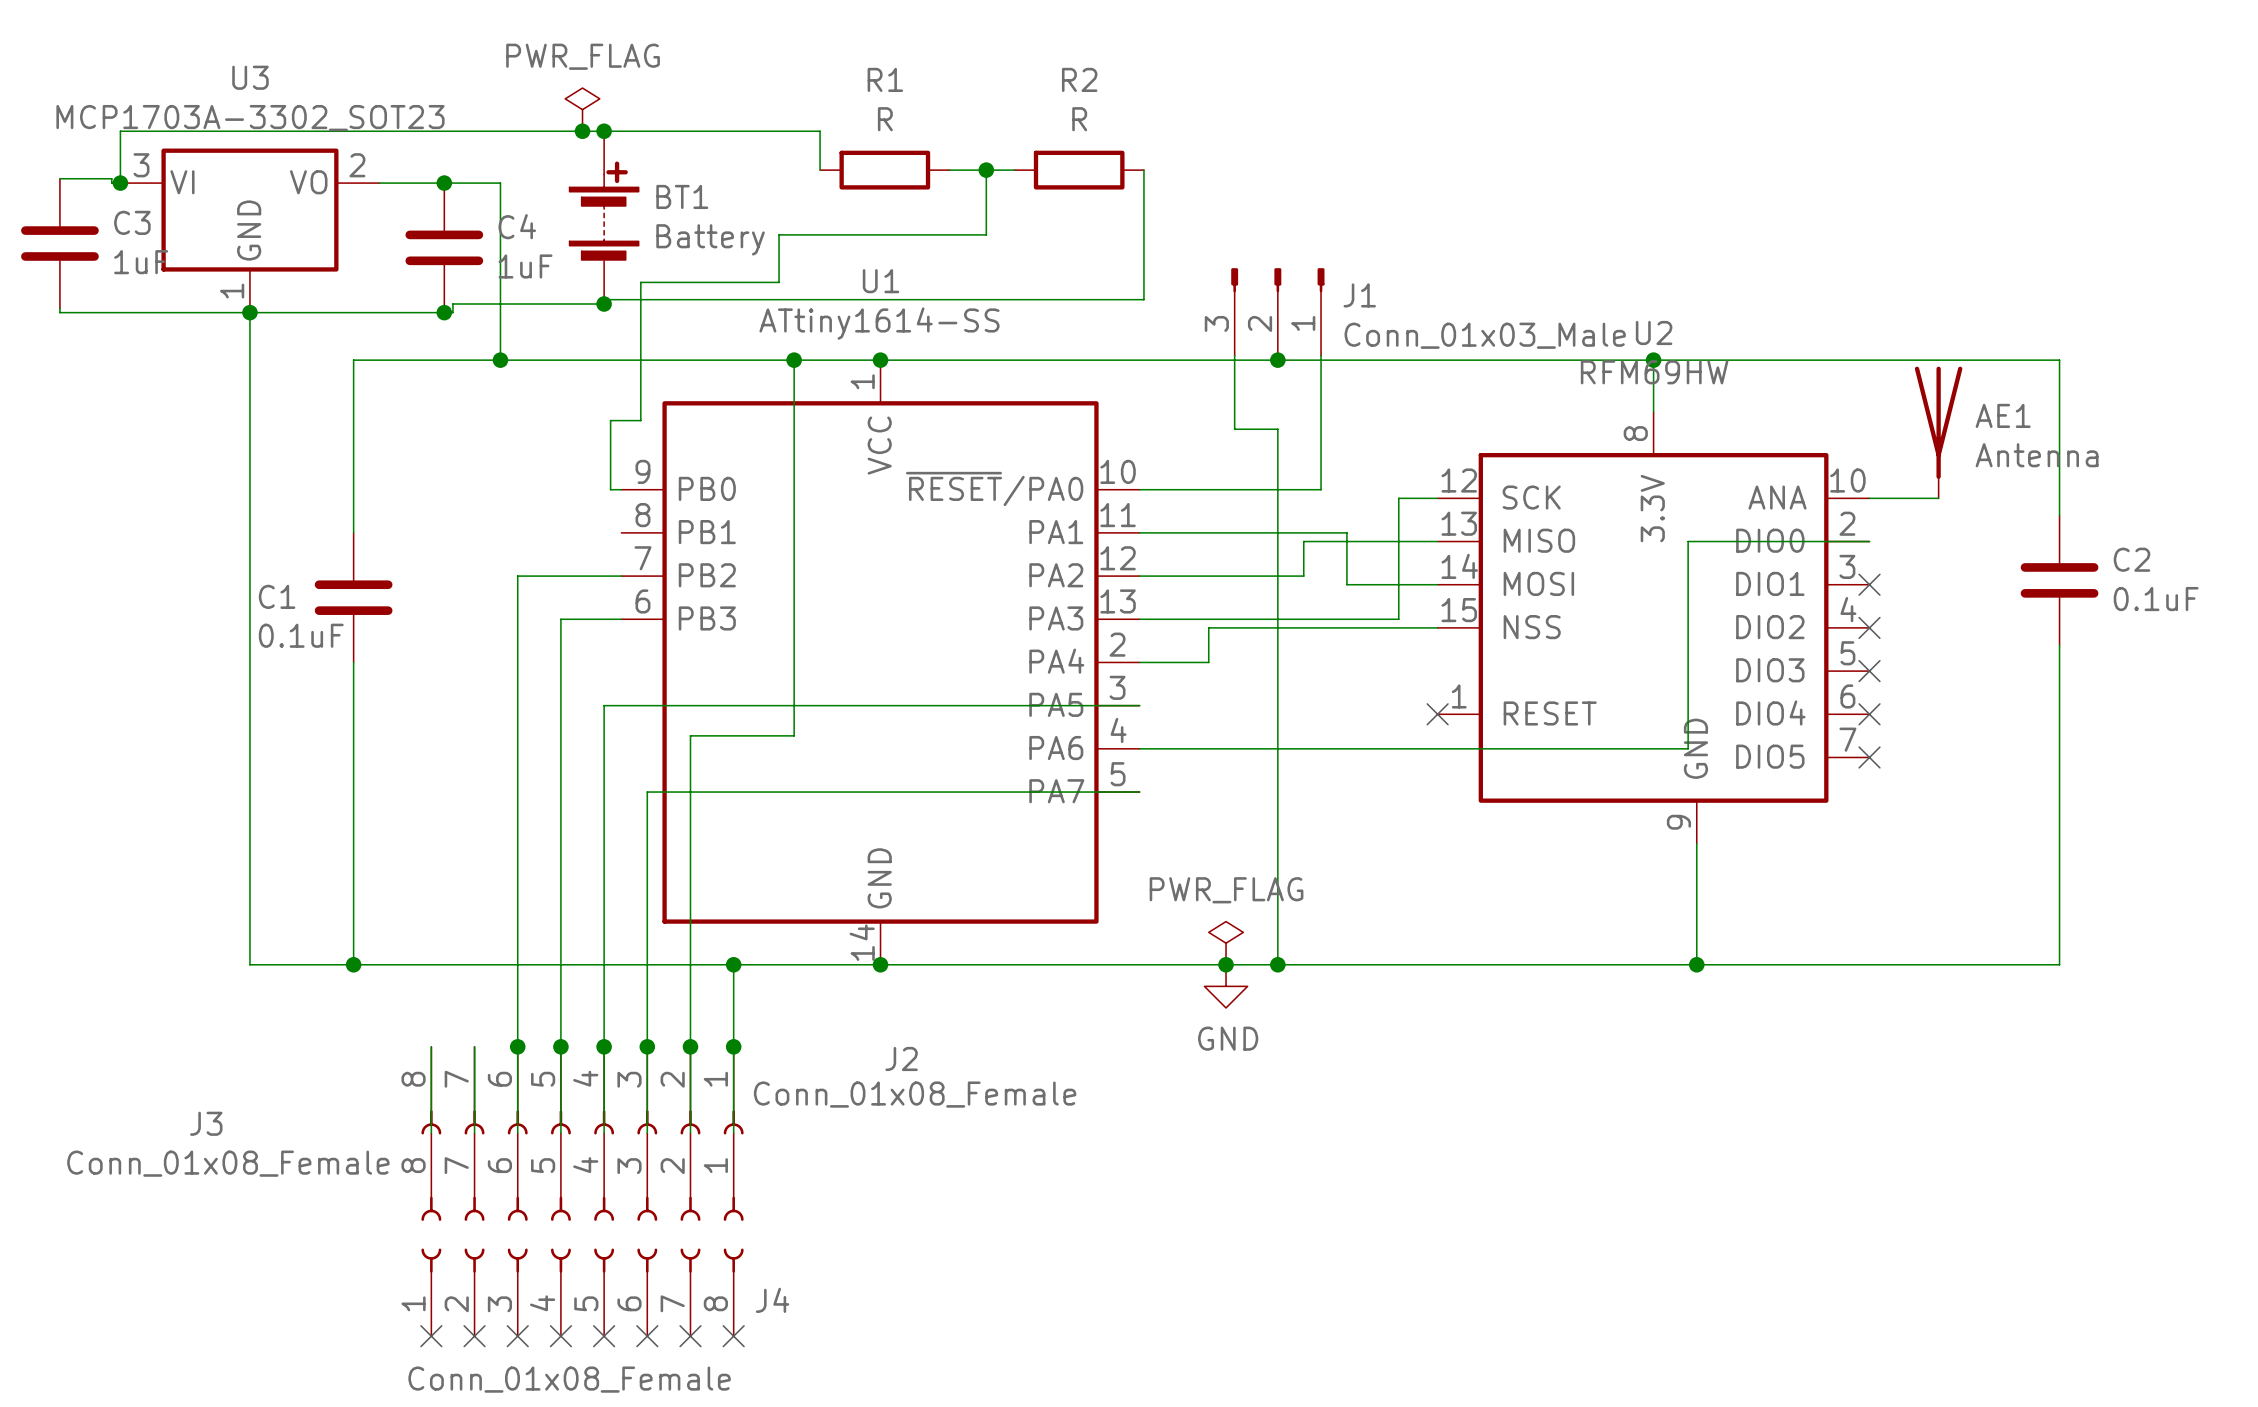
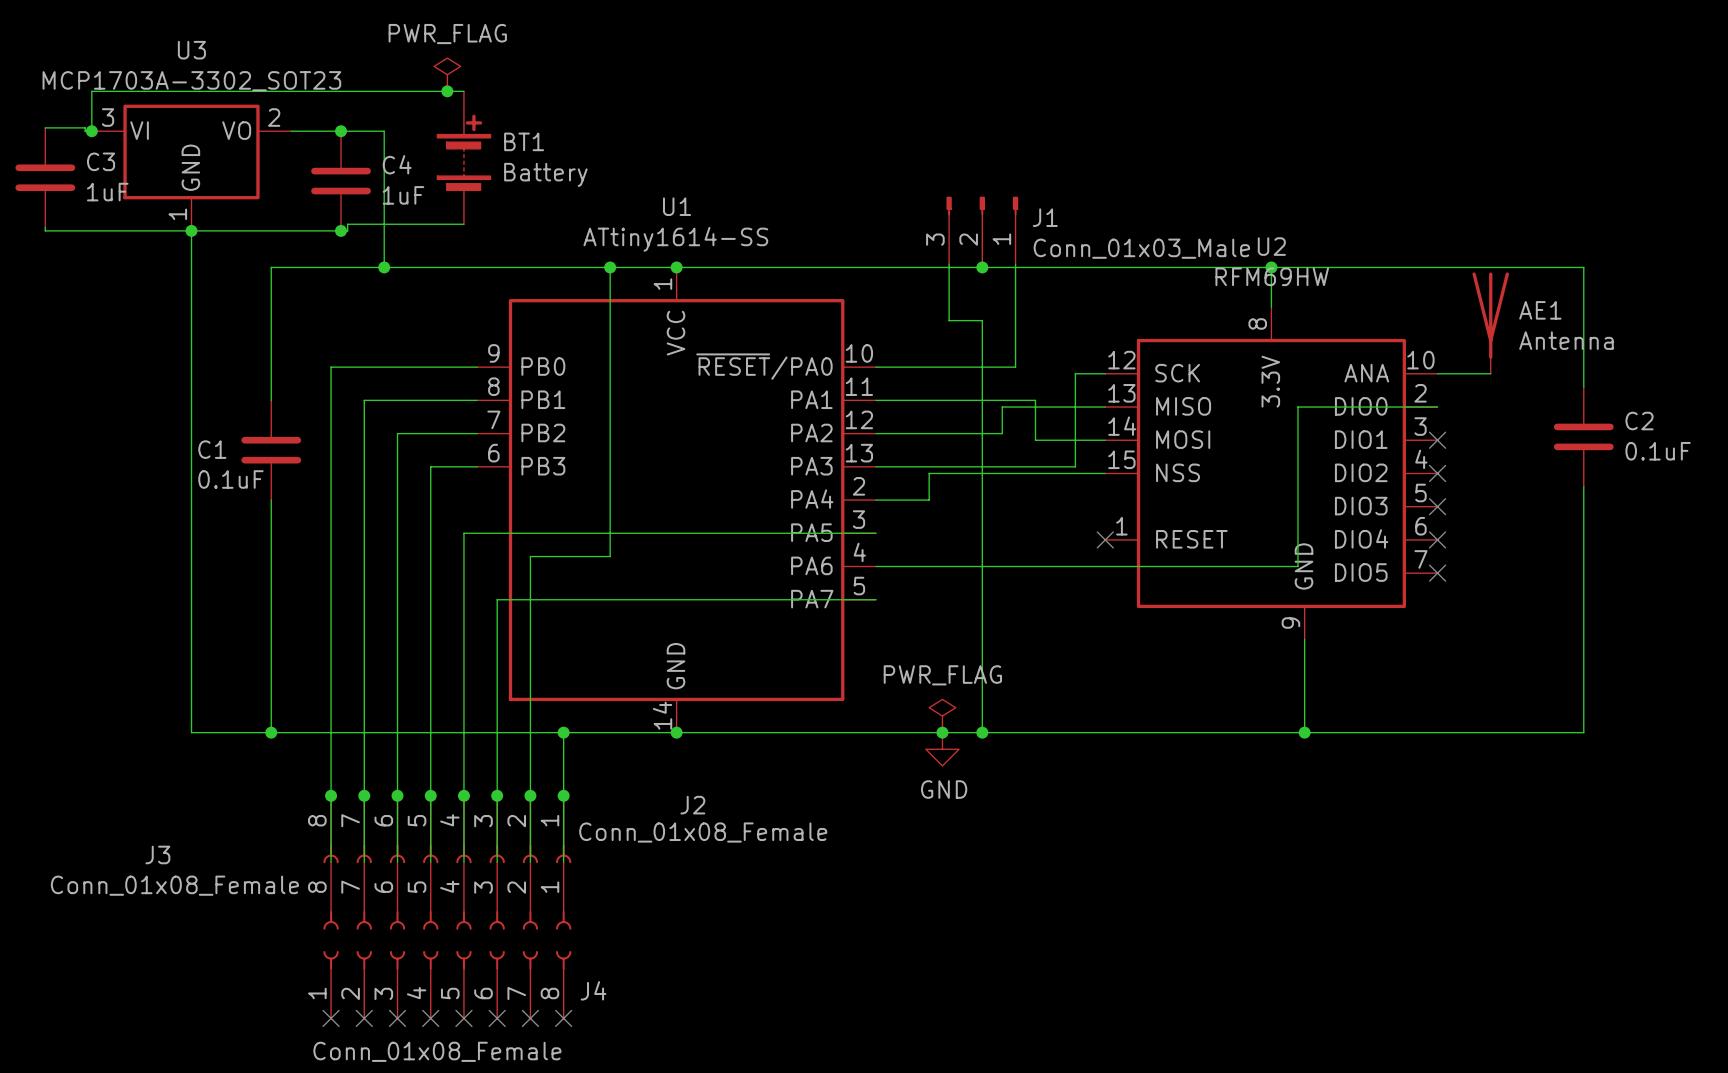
wire: (604, 131) (820, 131) (820, 170) -> none
junction: (604, 131) -> none
R1: R (884, 170) -> none
wire: (949, 170) (1014, 170) -> none
wire: (986, 170) (986, 234) (779, 234) (779, 282) (640, 282) (640, 420) (610, 420) (610, 489) -> (331, 795) (331, 367) (468, 367)
junction: (986, 170) -> none
R2: R (1079, 170) -> none
wire: (1143, 170) (1143, 299) (604, 299) (604, 304) -> none
junction: (604, 304) -> none
wire: none -> (477, 400) (364, 400) (364, 795)
junction: none -> (331, 795)
junction: none -> (364, 795)

